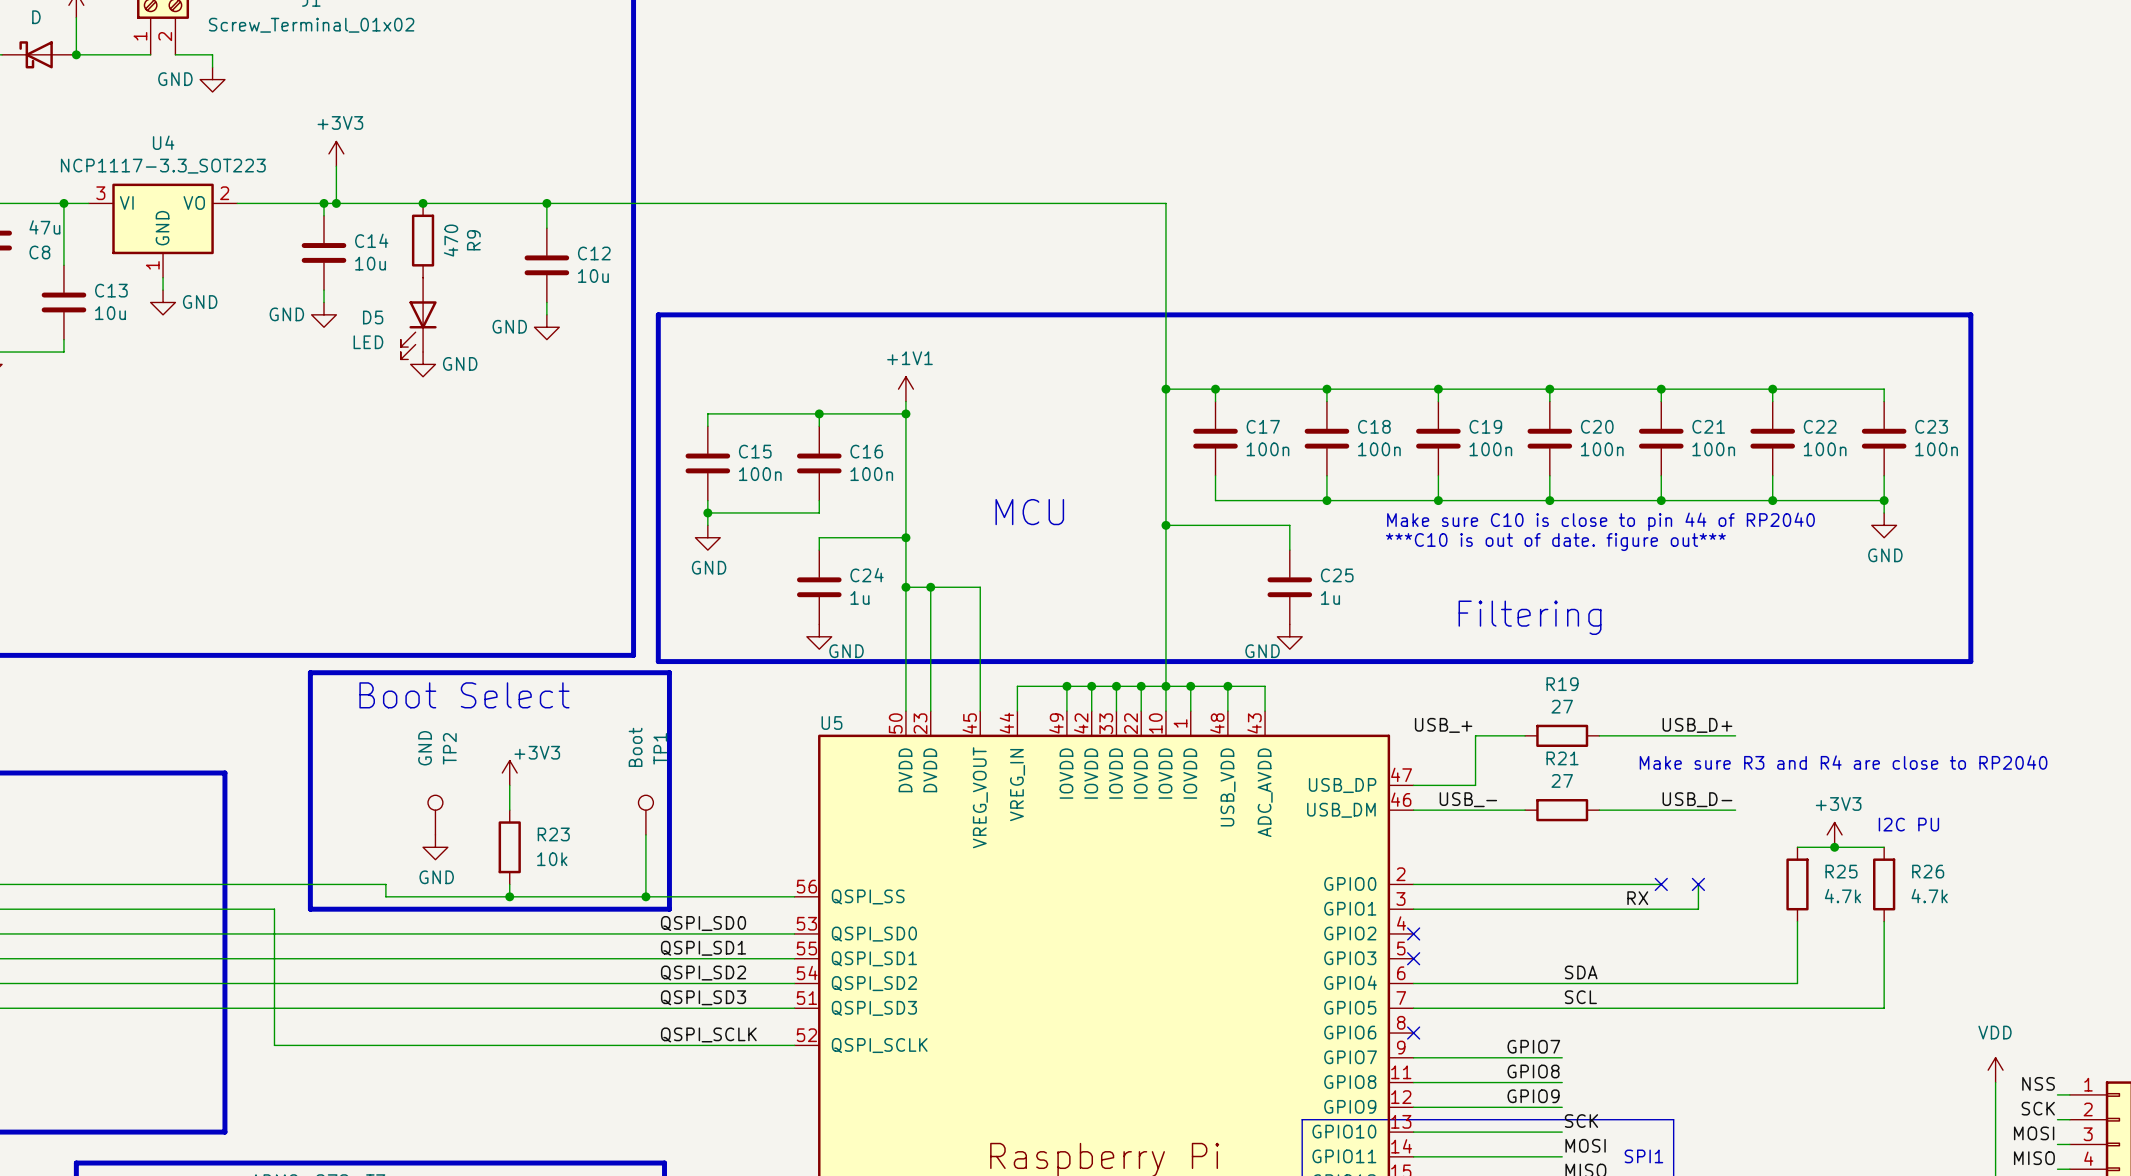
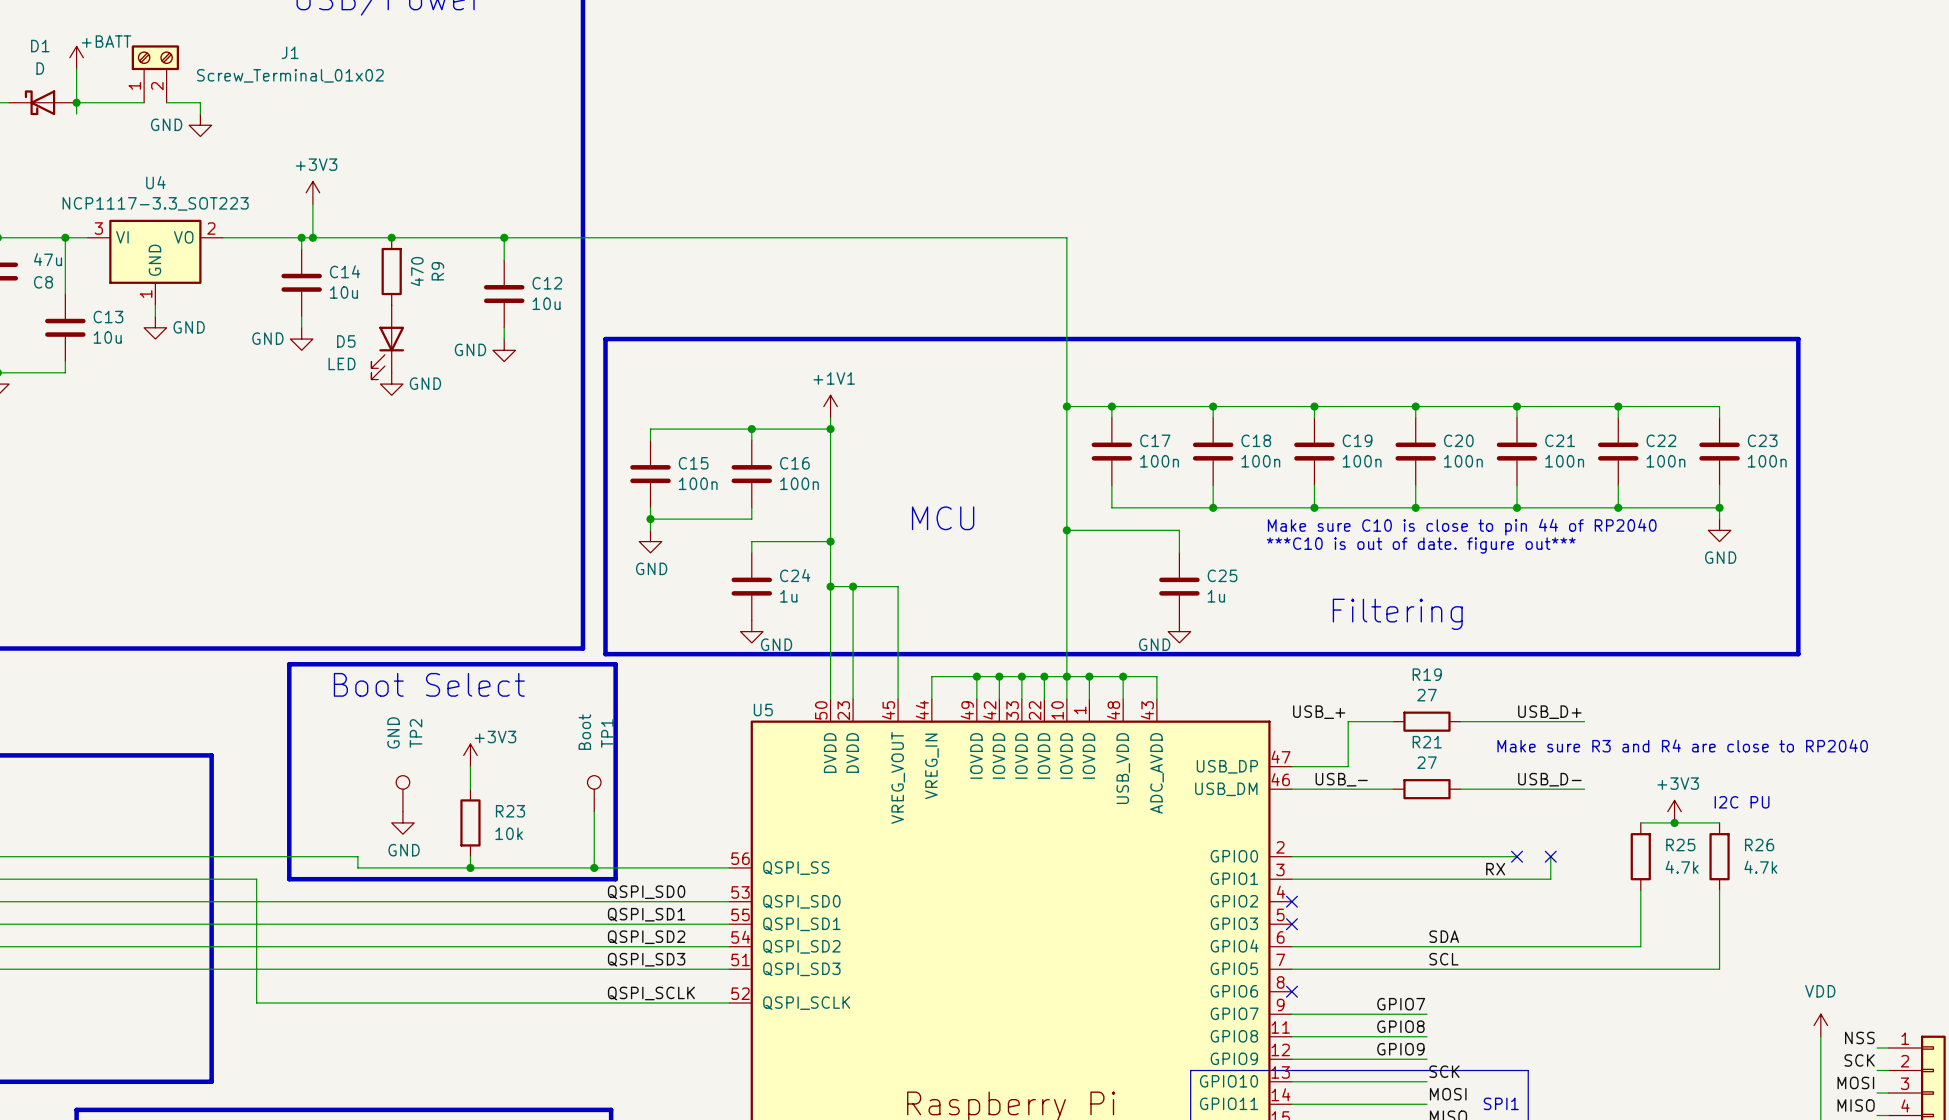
wire: none -> (76, 102) (76, 113)

